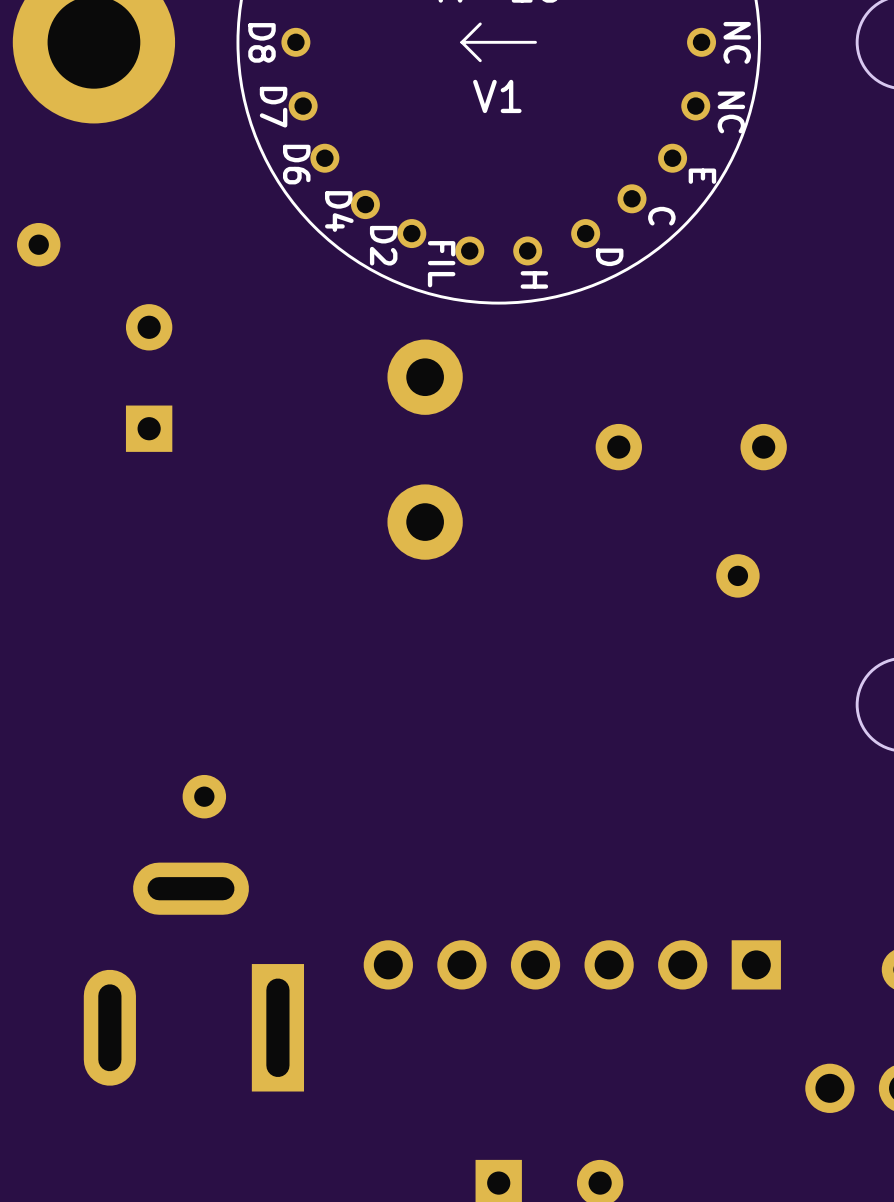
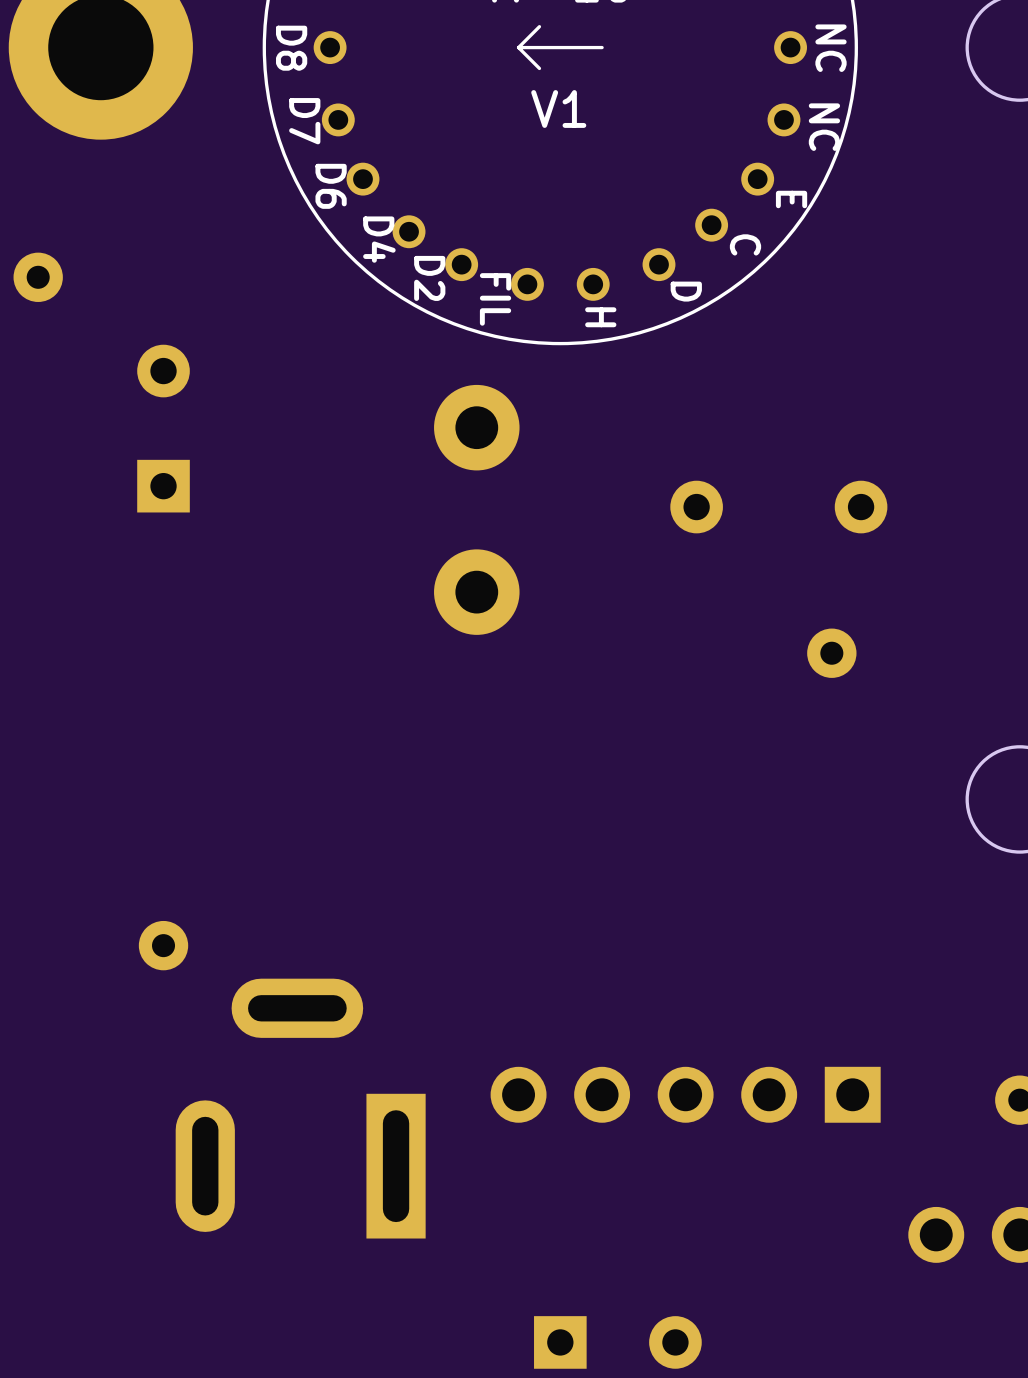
part position: (204, 796) -> (163, 945)
part: (572, 964) -> none
part position: (193, 977) -> (300, 1108)

